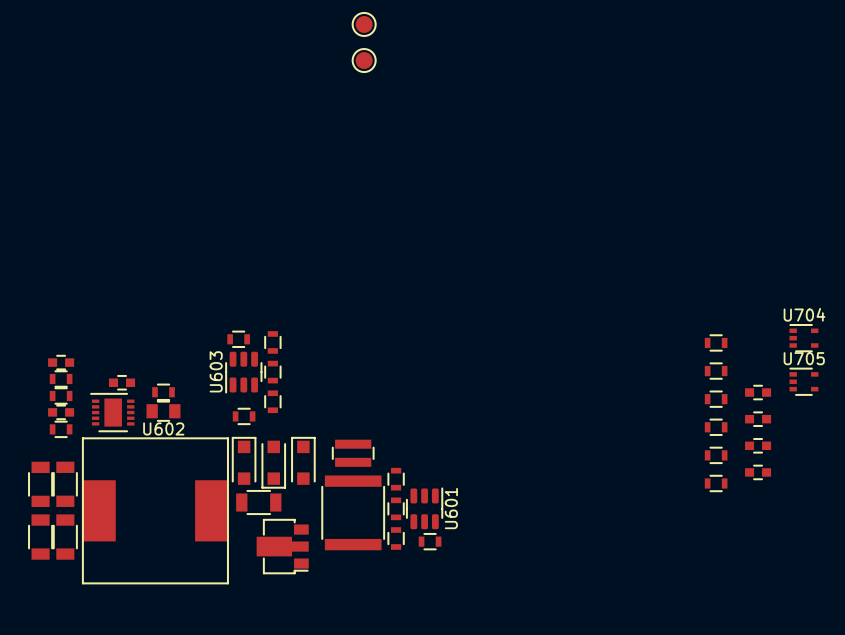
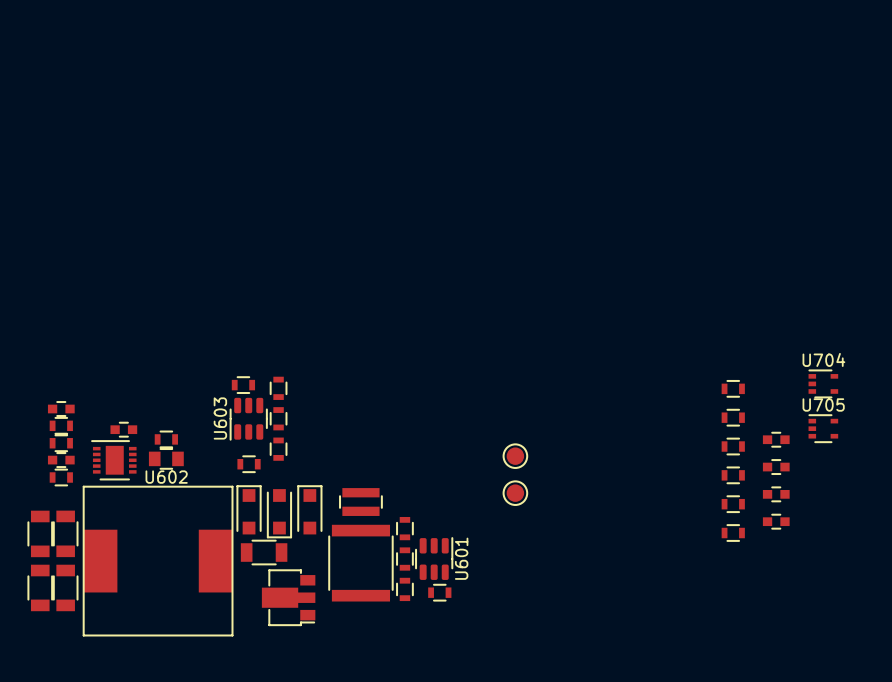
part: (364, 24) -> none
part: (364, 60) -> none
part: none -> (515, 456)
part: none -> (515, 493)

